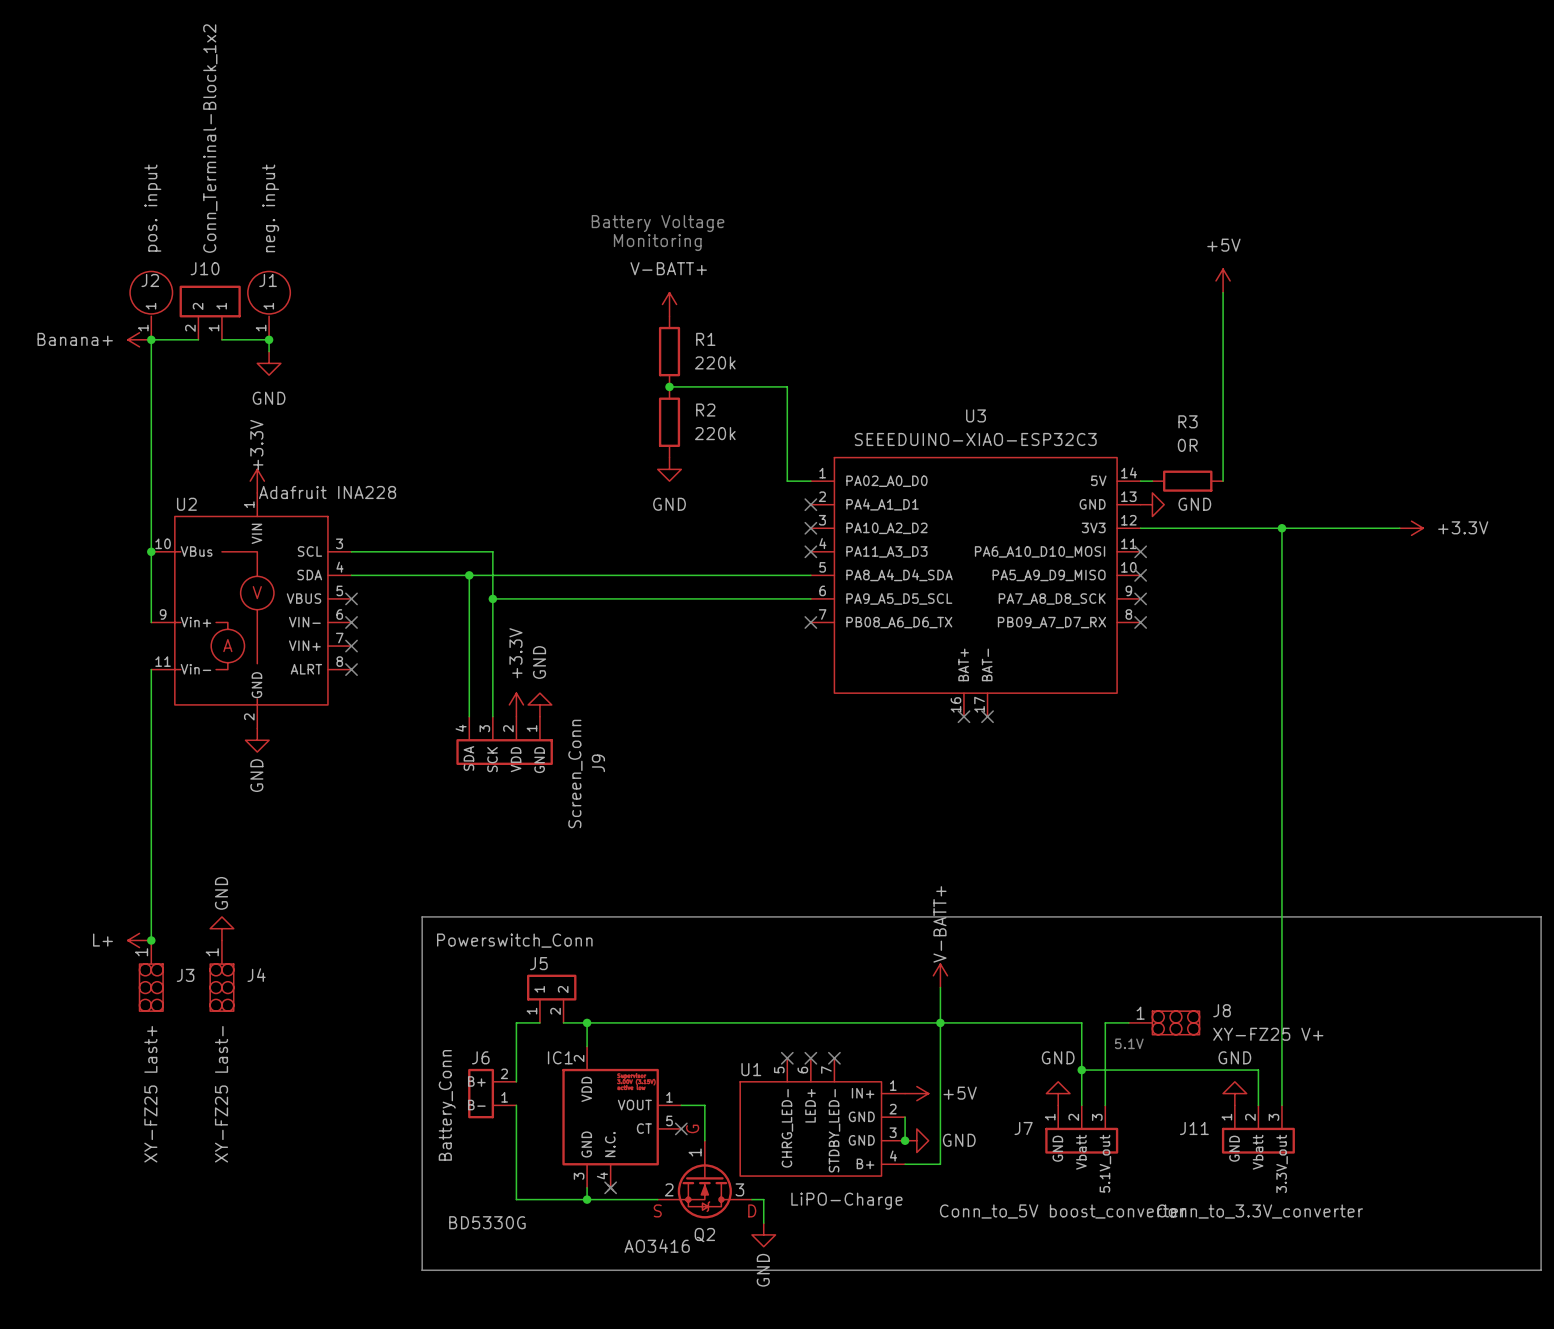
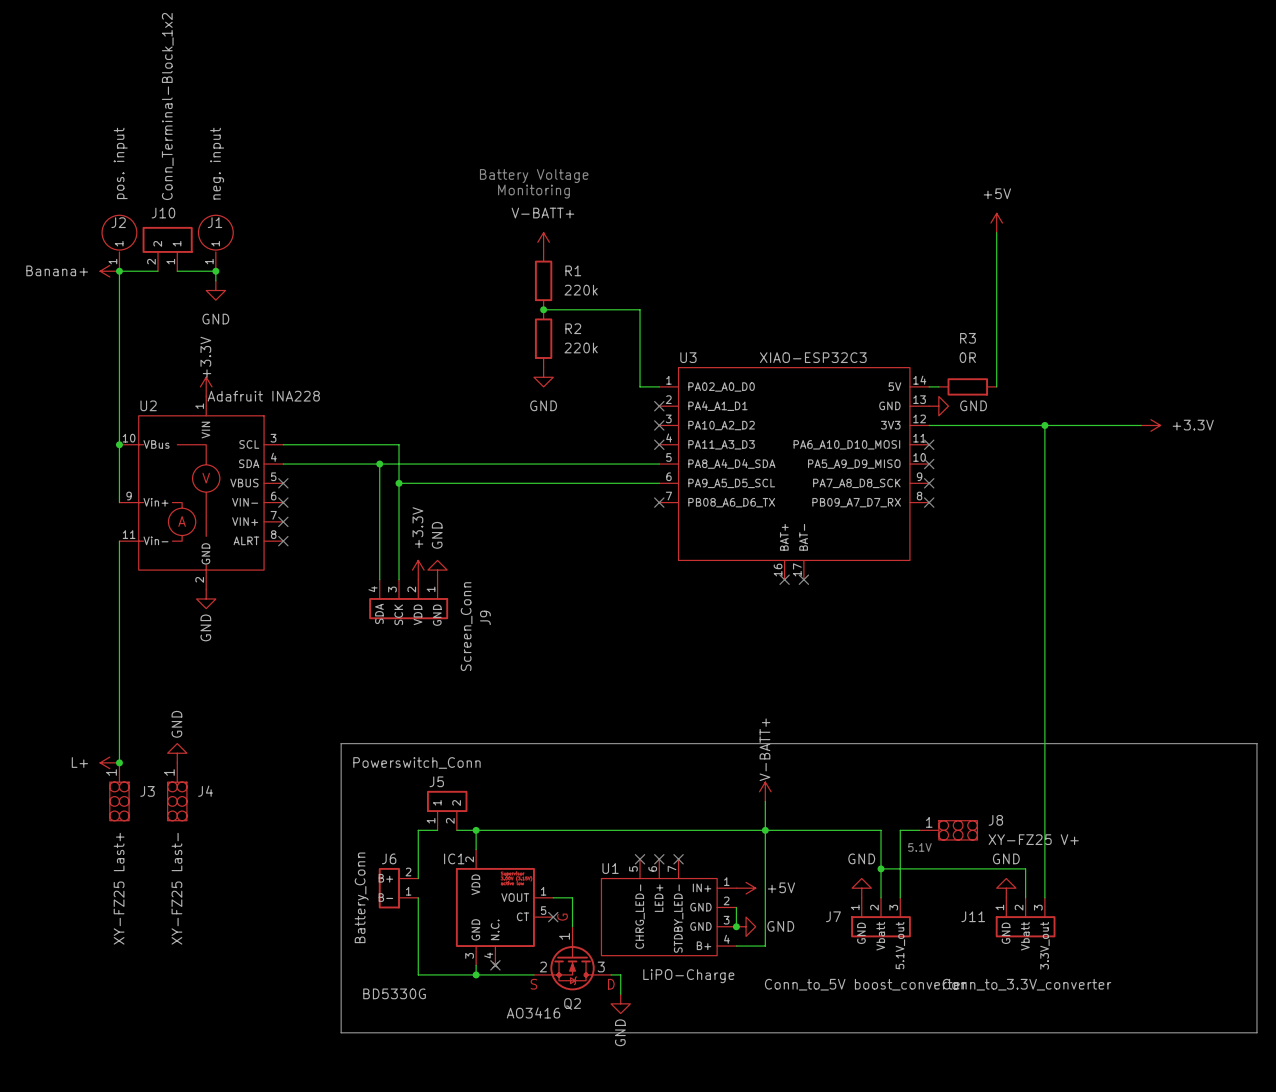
U3 name position: U3 (976, 415) -> U3 (688, 357)
U3 value: SEEEDUINO-XIAO-ESP32C3 (975, 439) -> XIAO-ESP32C3 (813, 357)

